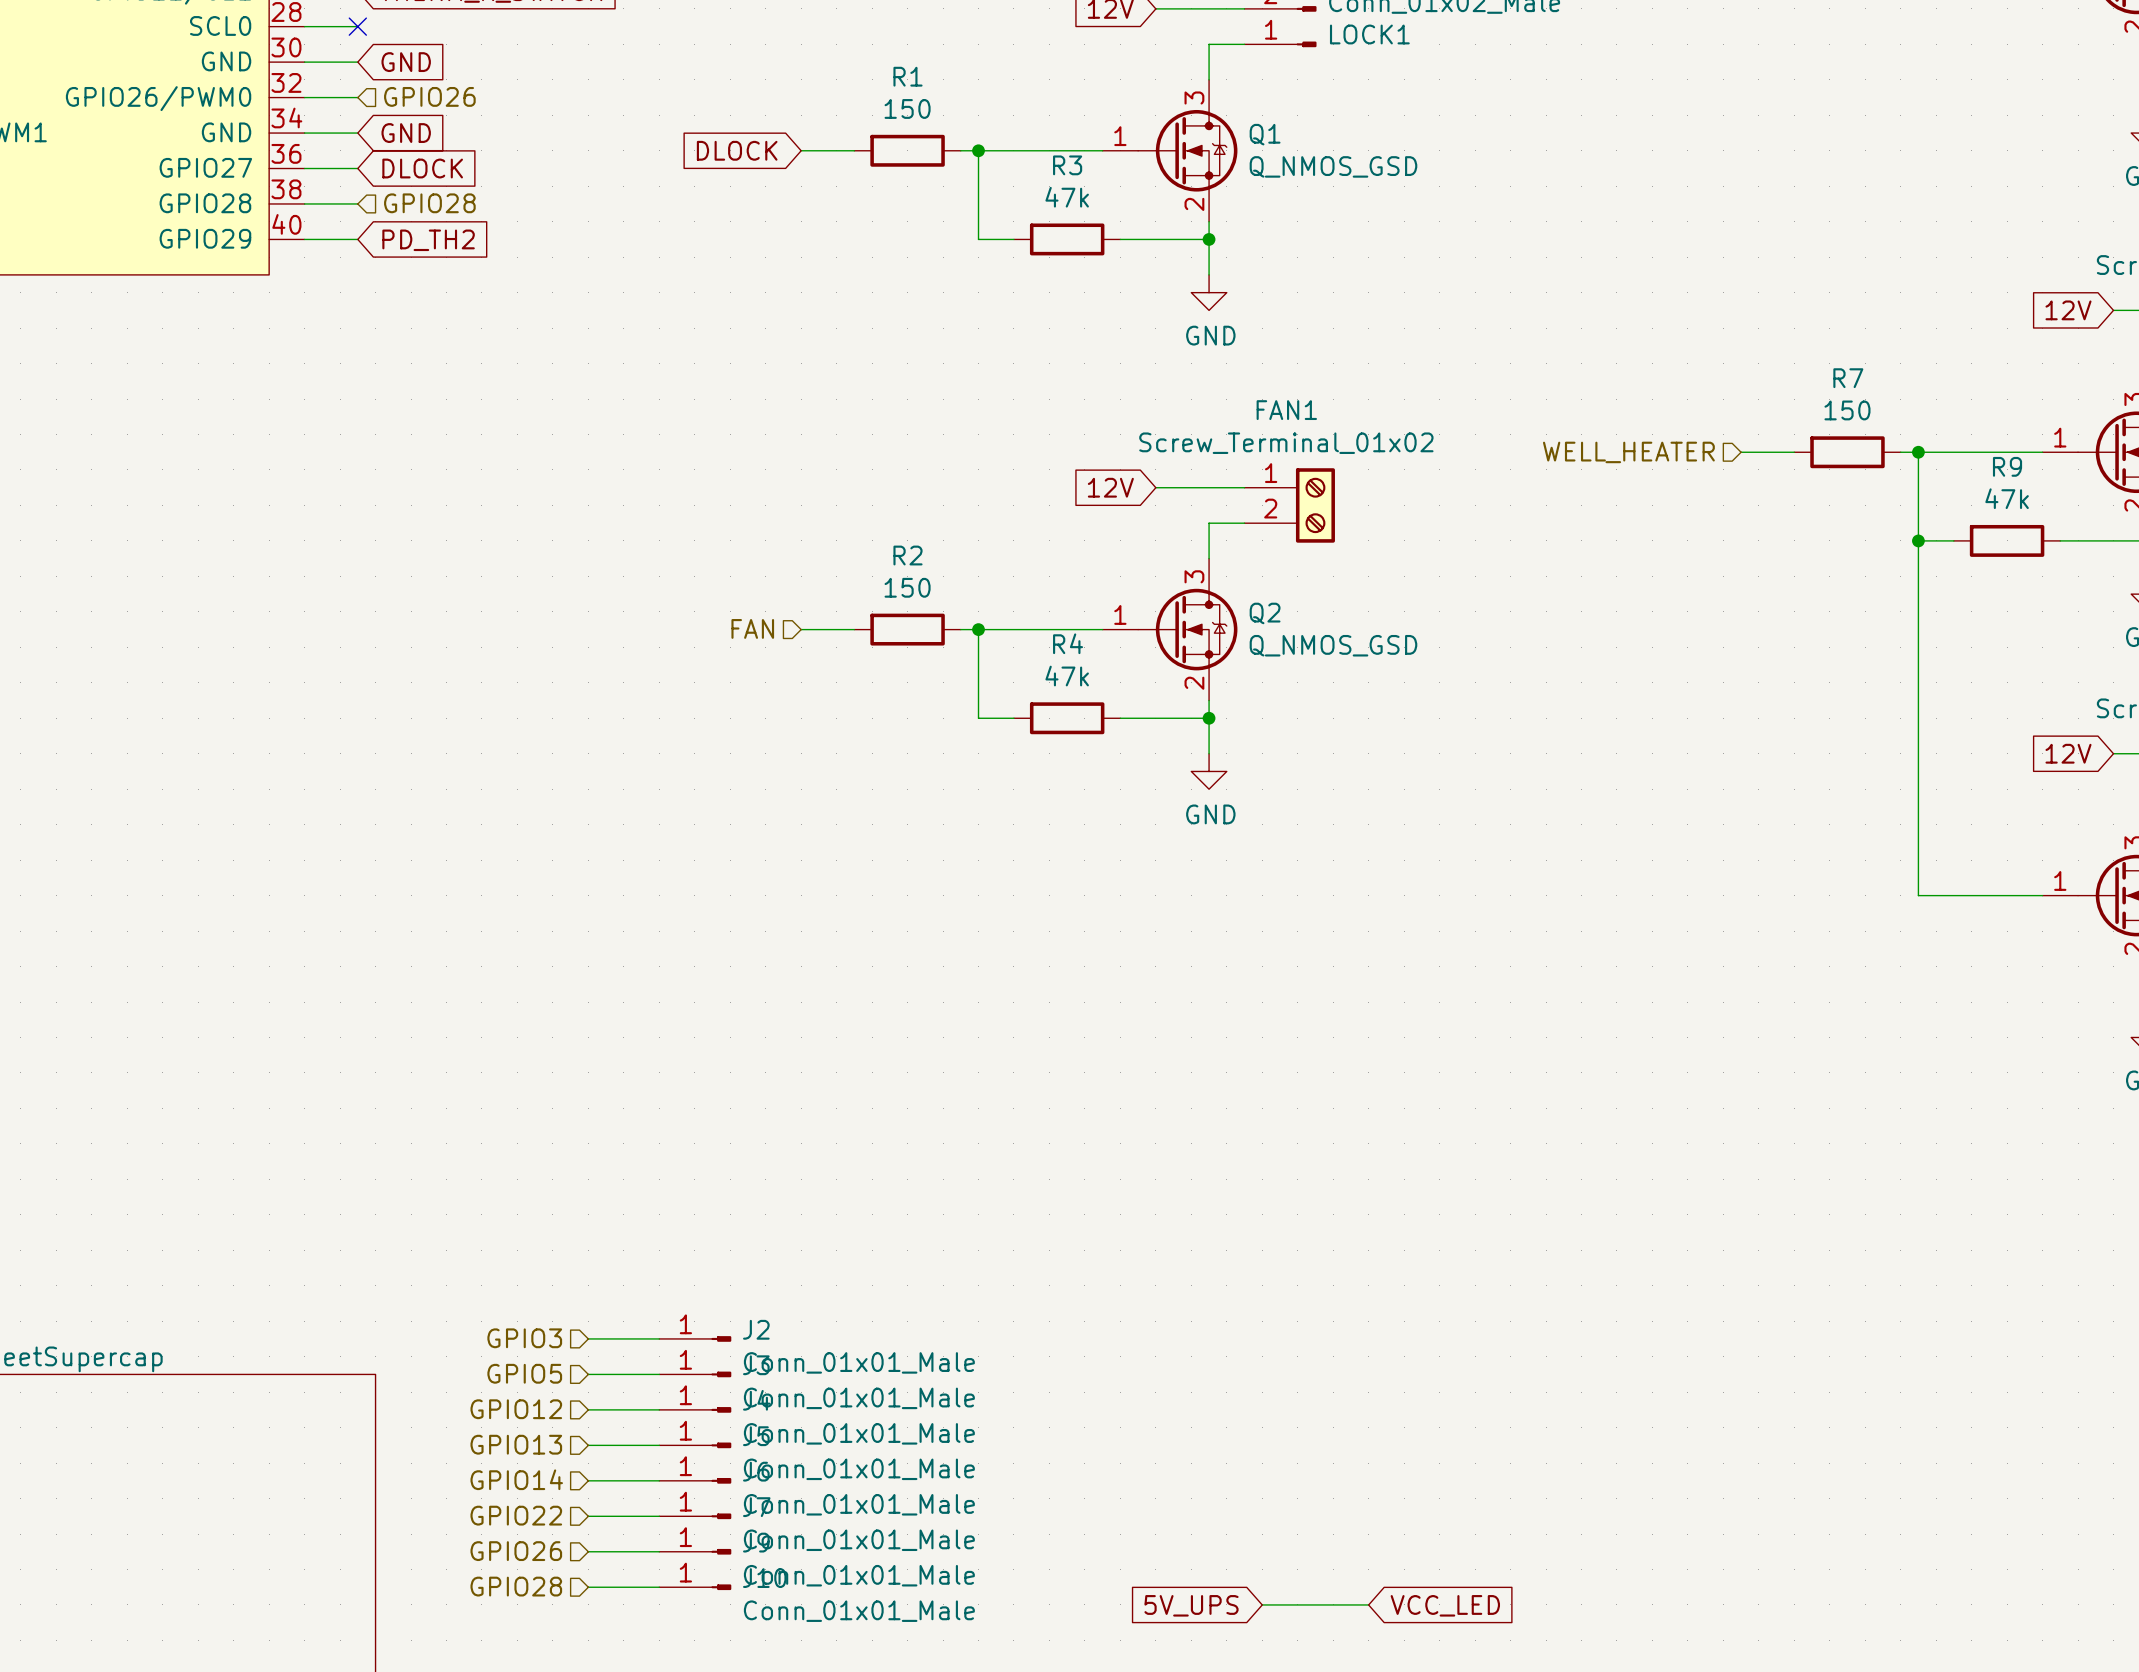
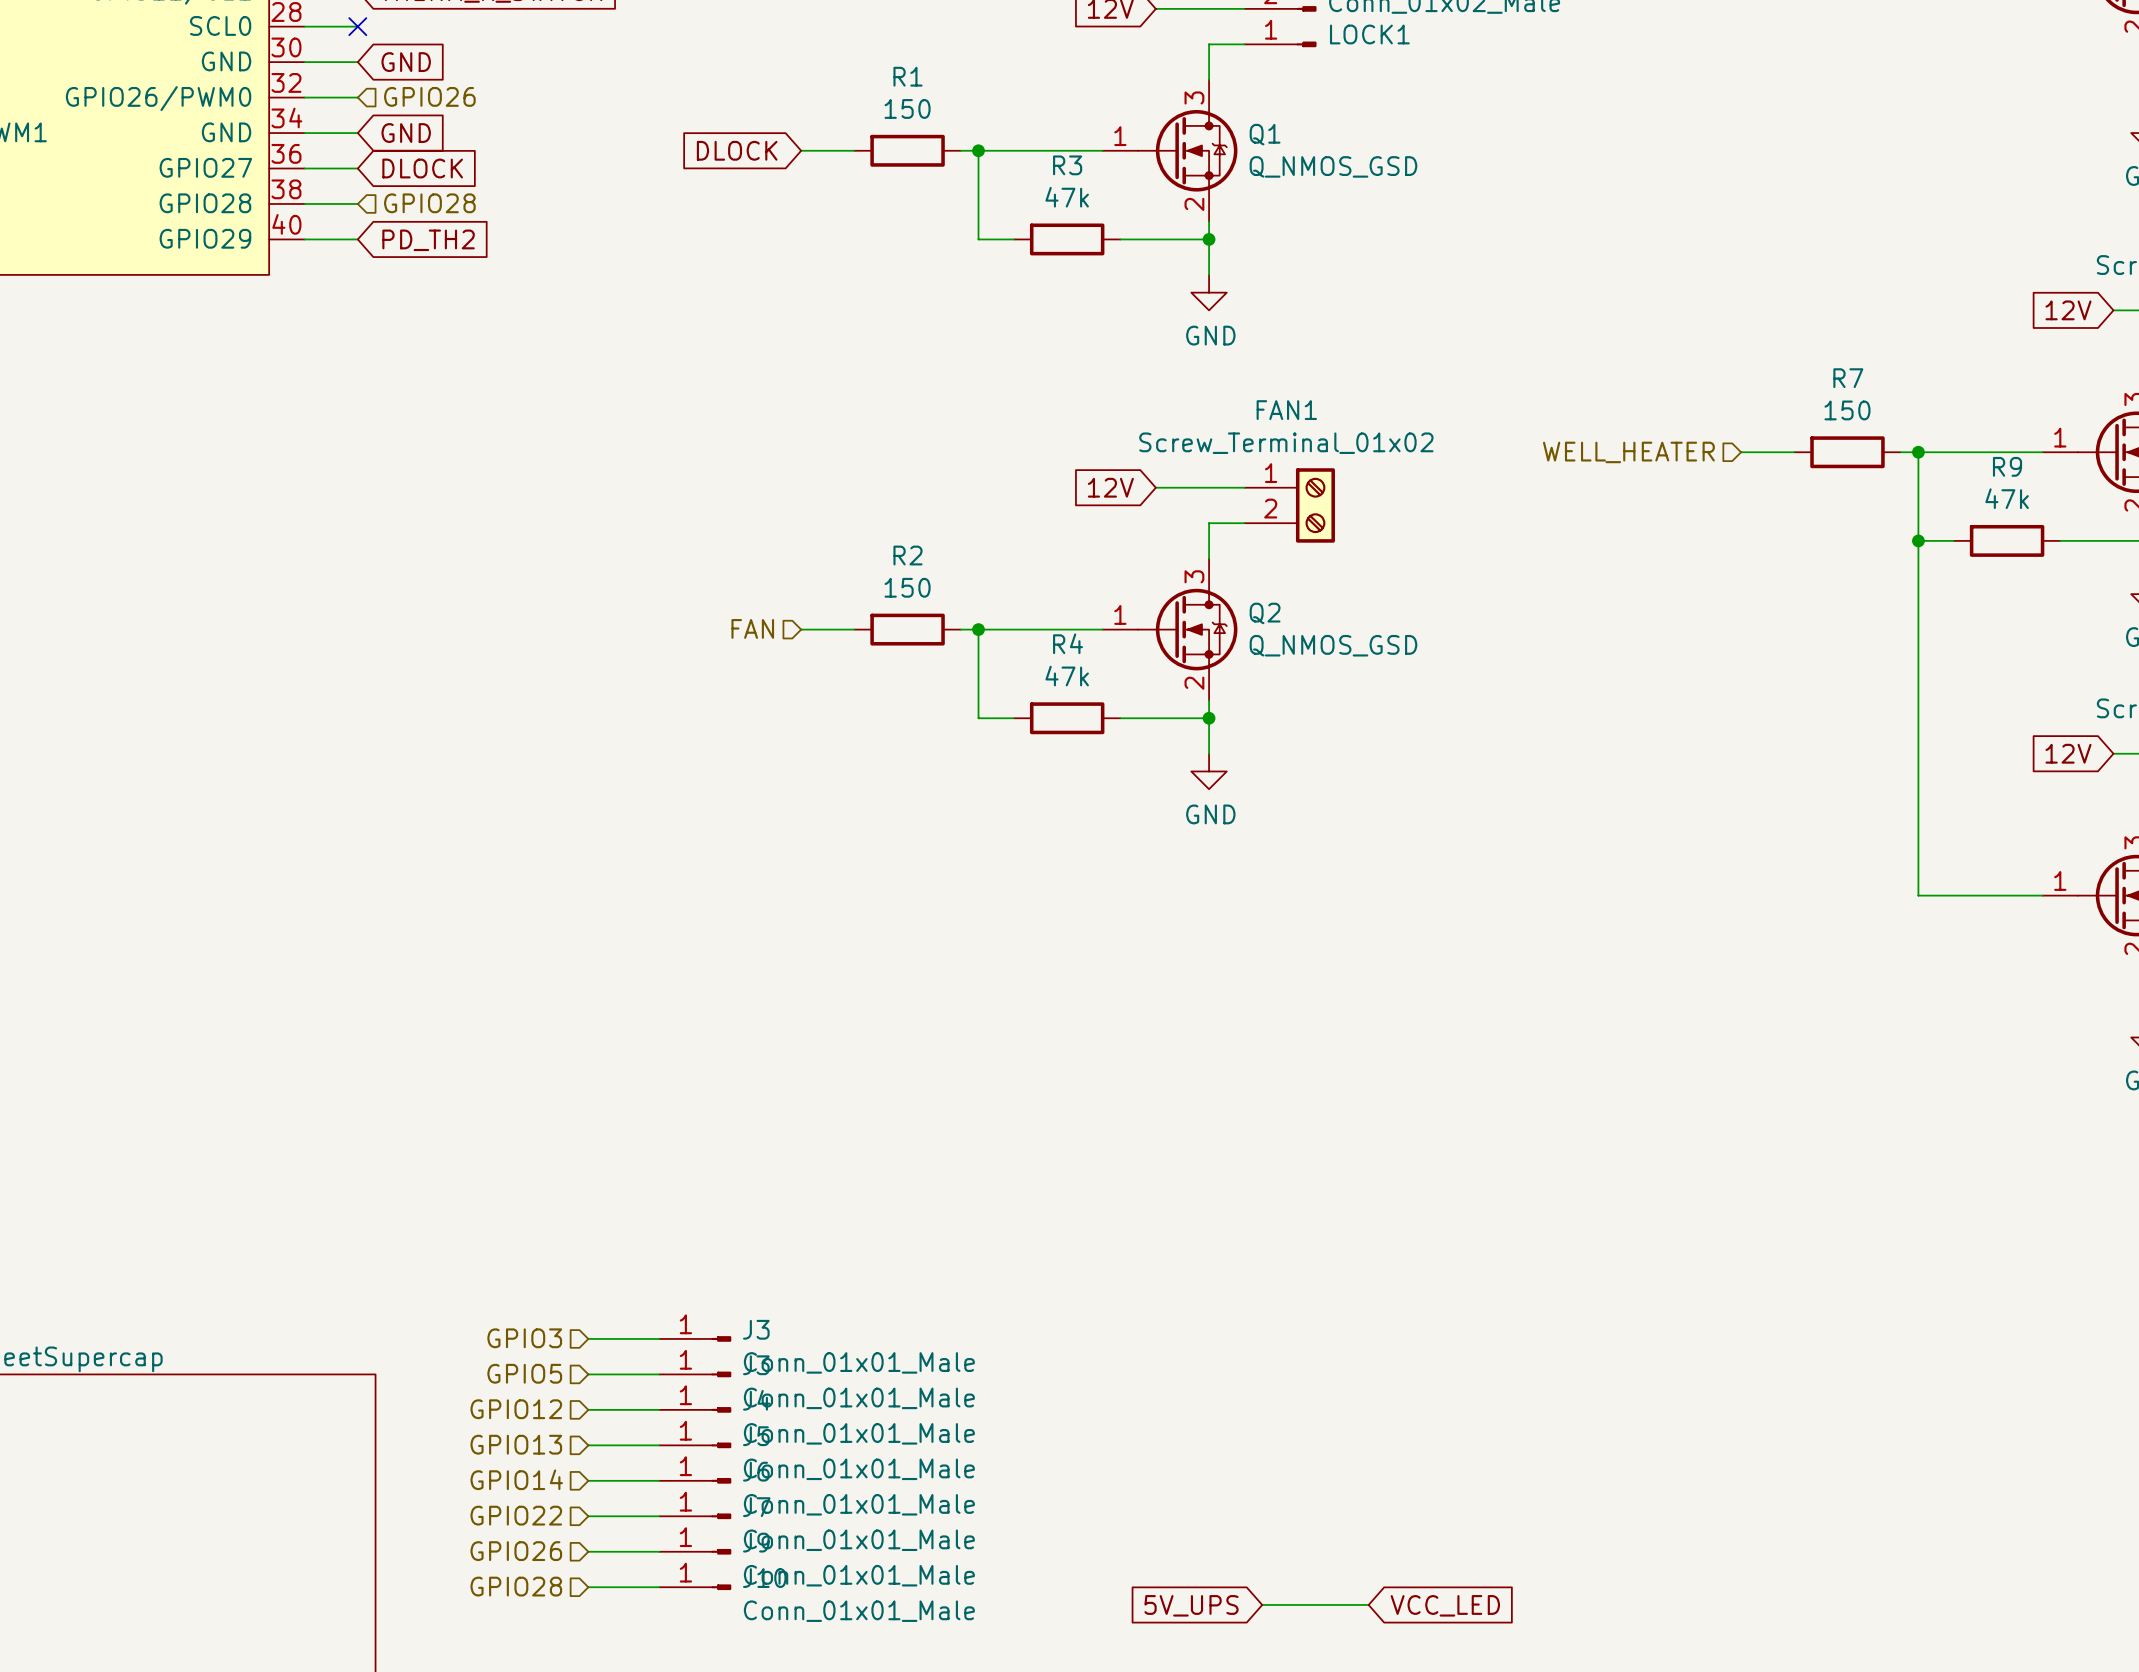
J2 name: J2 (756, 1329) -> J3 (756, 1329)

